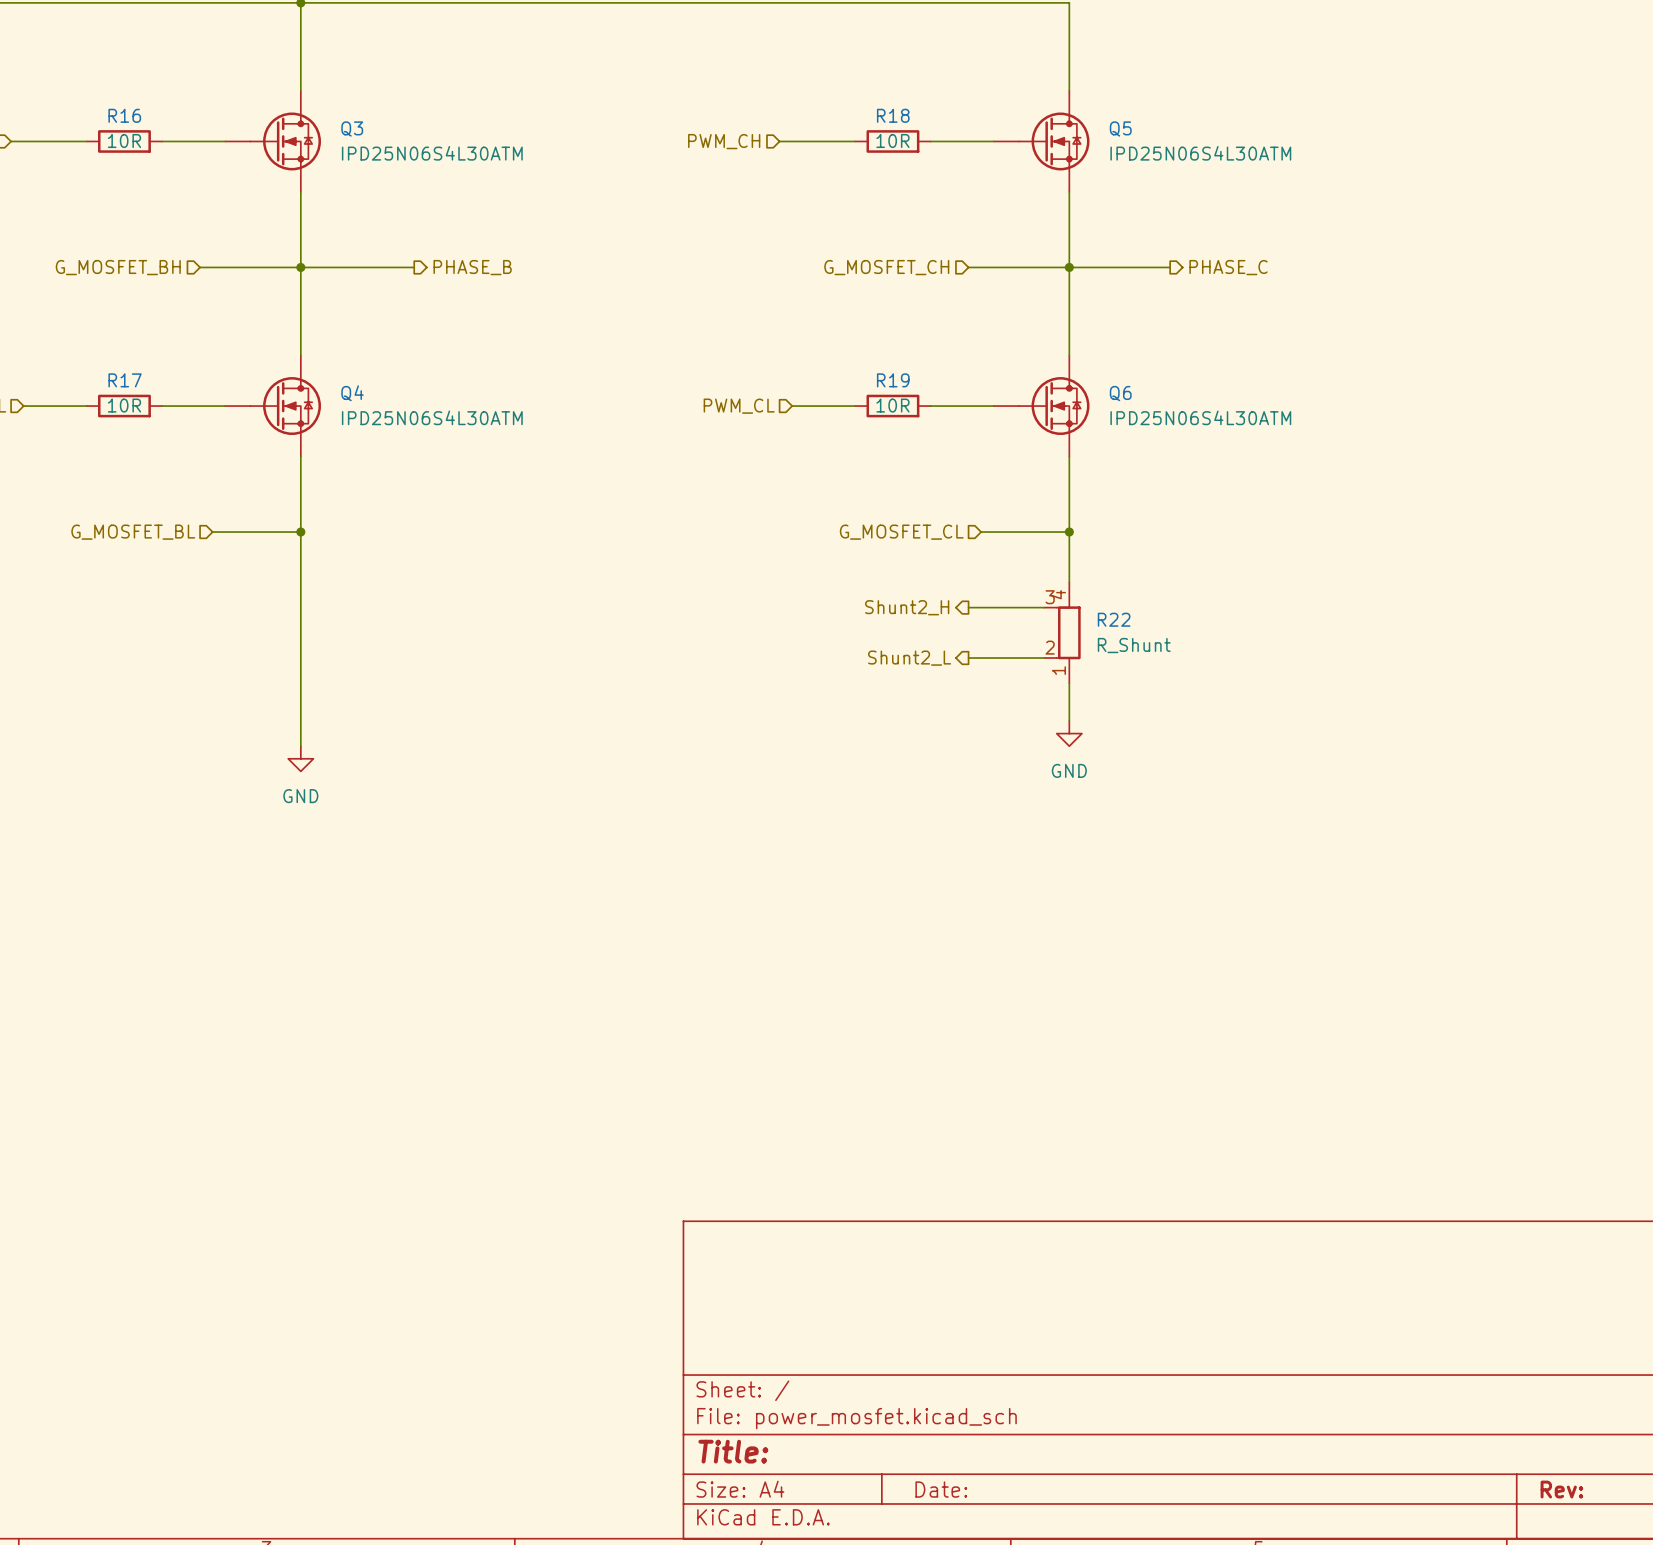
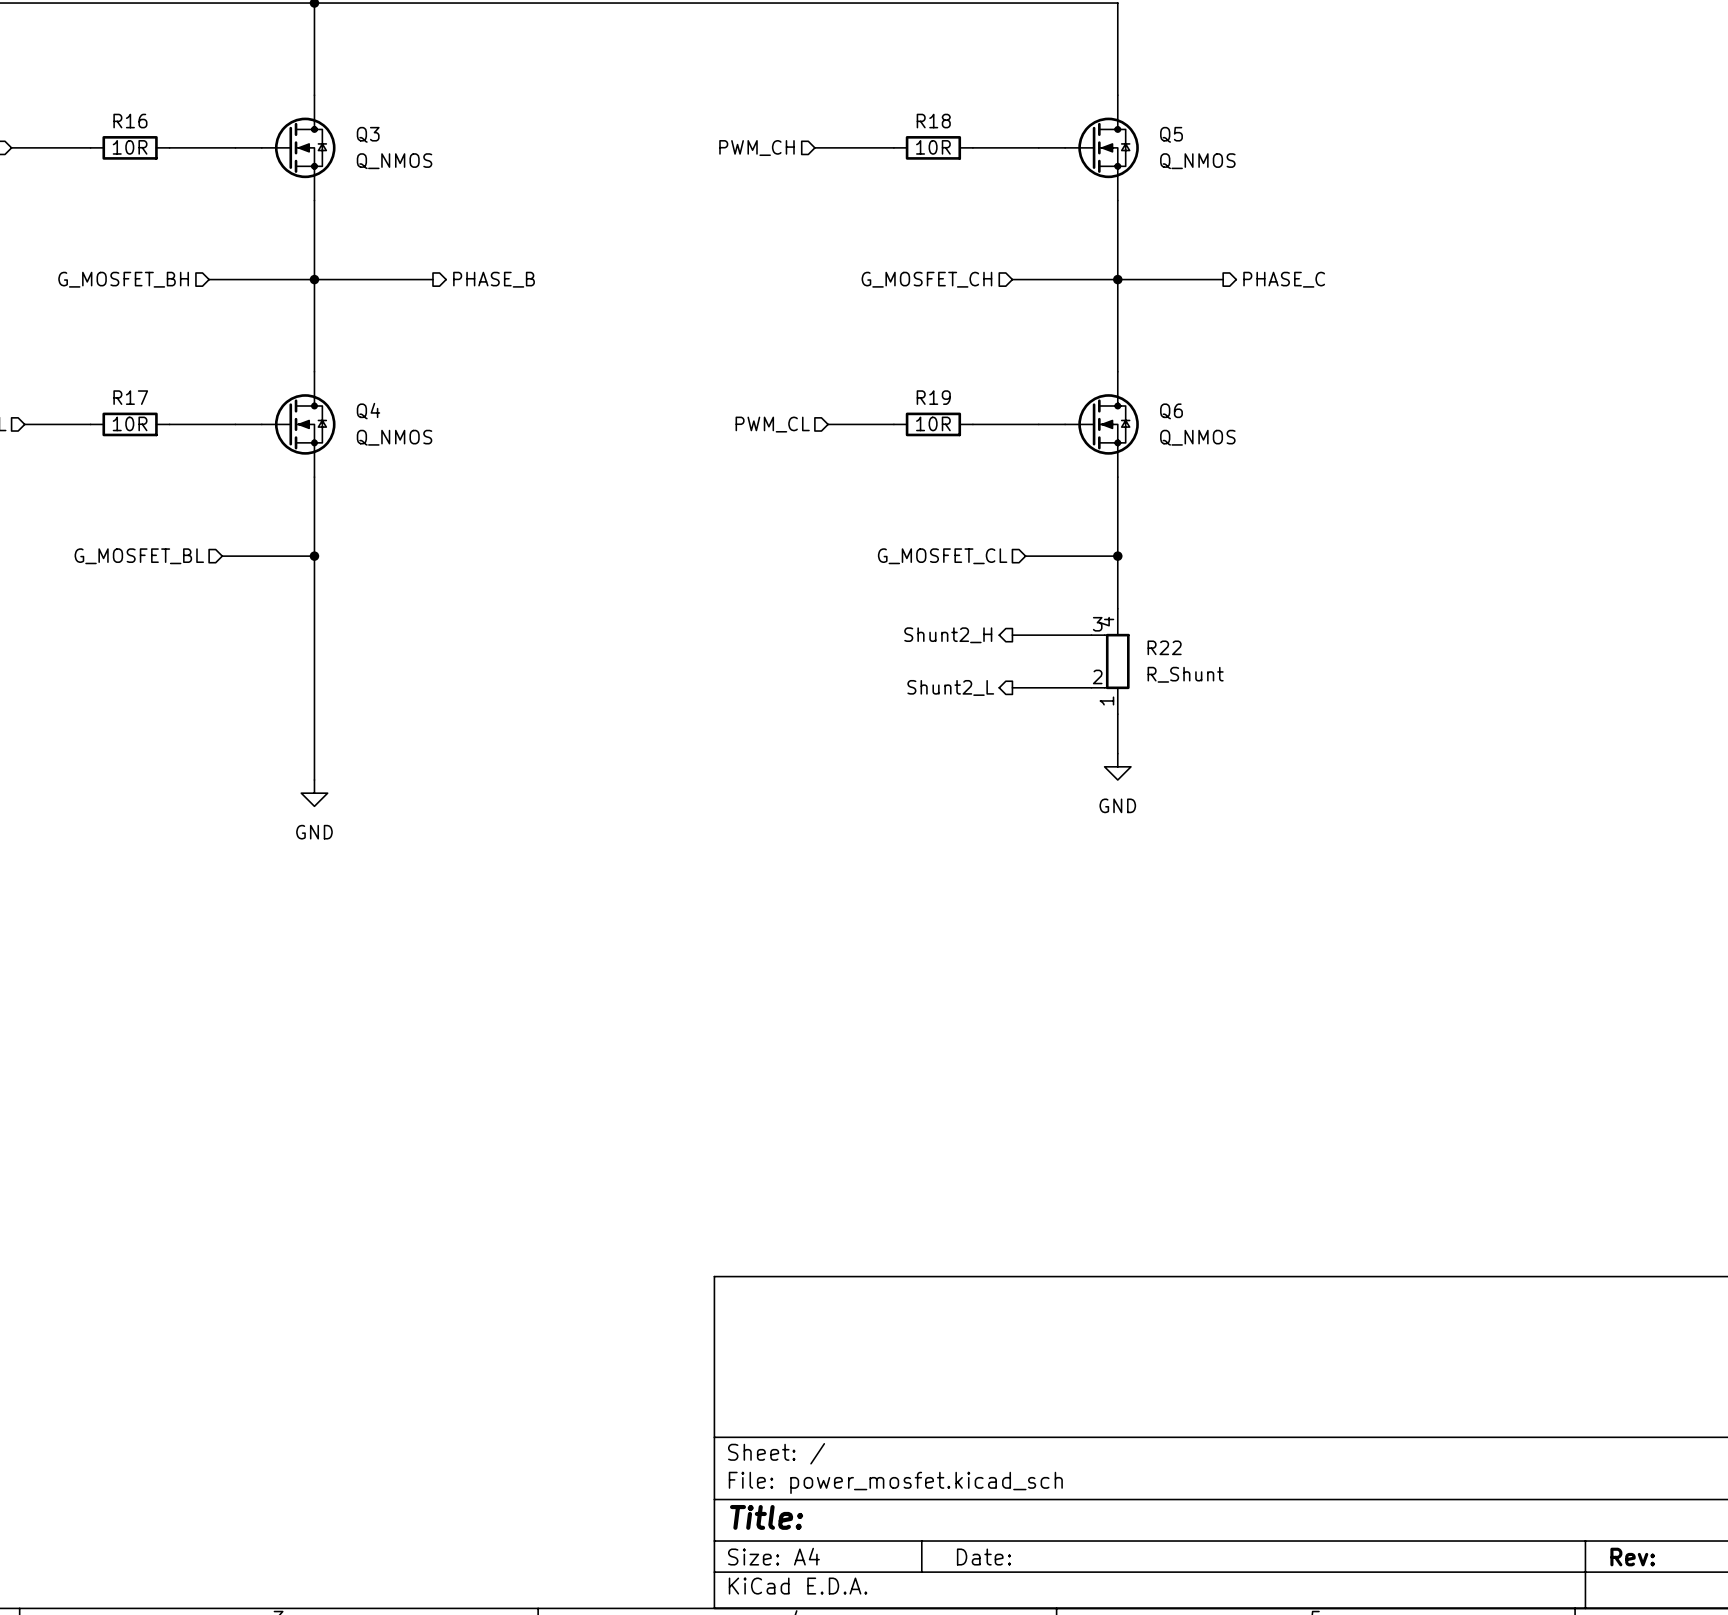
Q3 value: IPD25N06S4L30ATM (432, 153) -> Q_NMOS (394, 161)
Q5 value: IPD25N06S4L30ATM (1200, 153) -> Q_NMOS (1197, 161)
Q4 value: IPD25N06S4L30ATM (432, 417) -> Q_NMOS (394, 437)
Q6 value: IPD25N06S4L30ATM (1200, 417) -> Q_NMOS (1197, 437)

